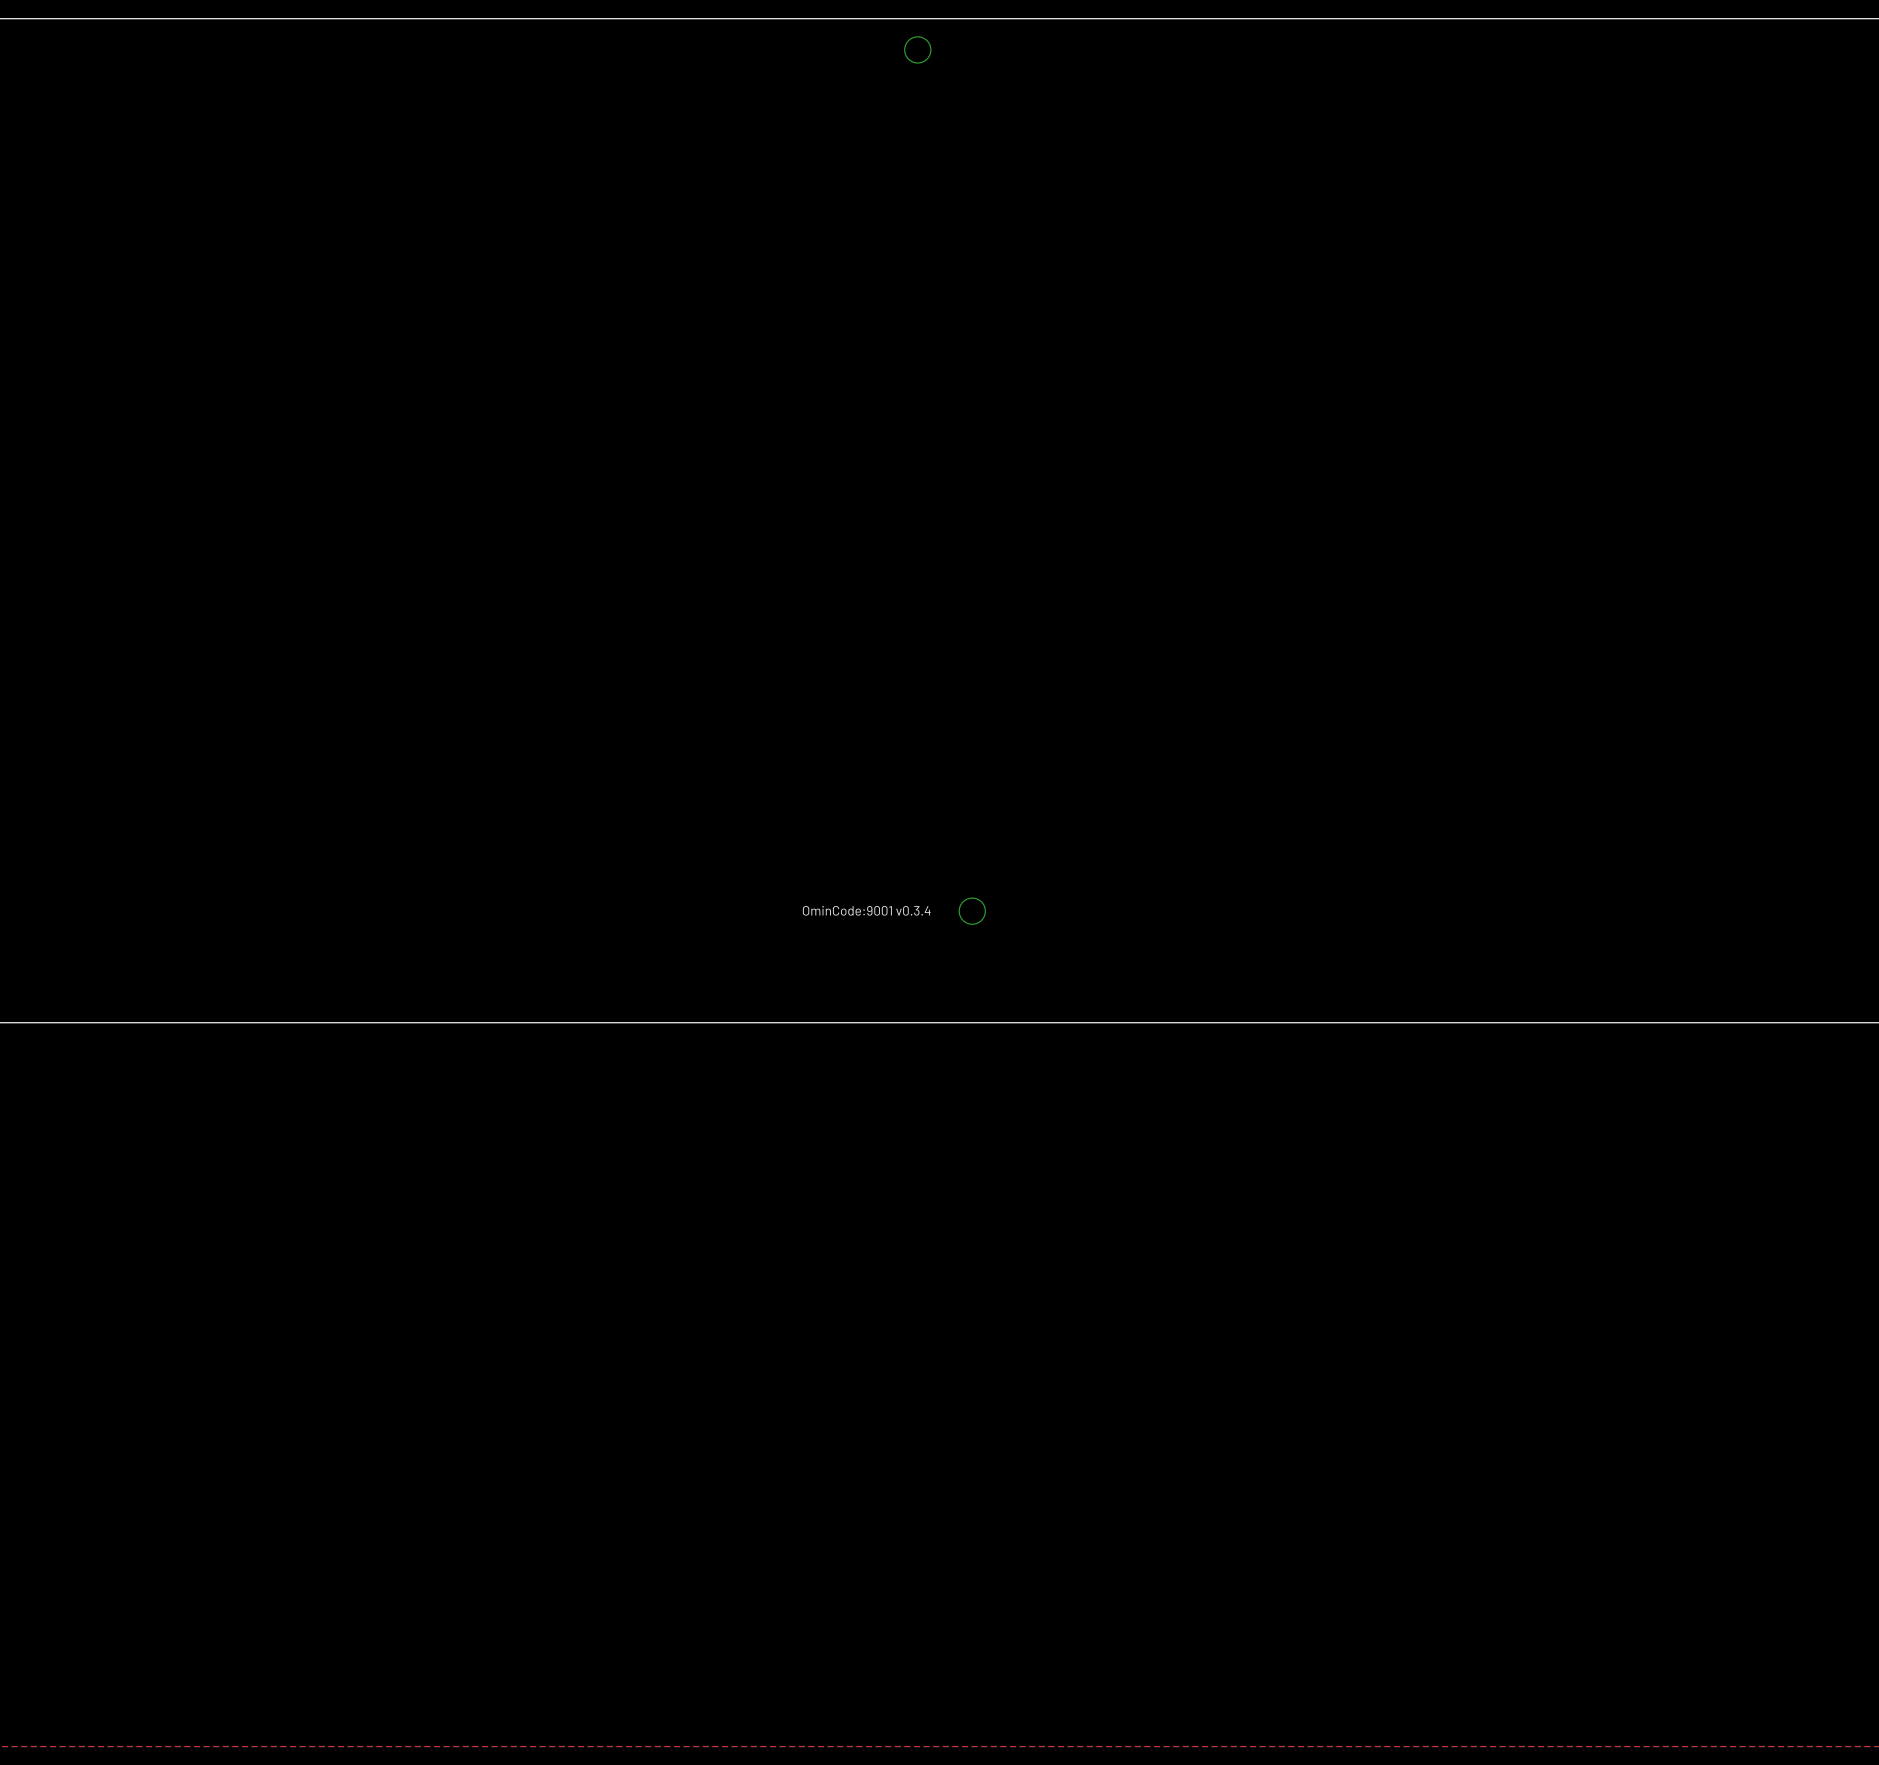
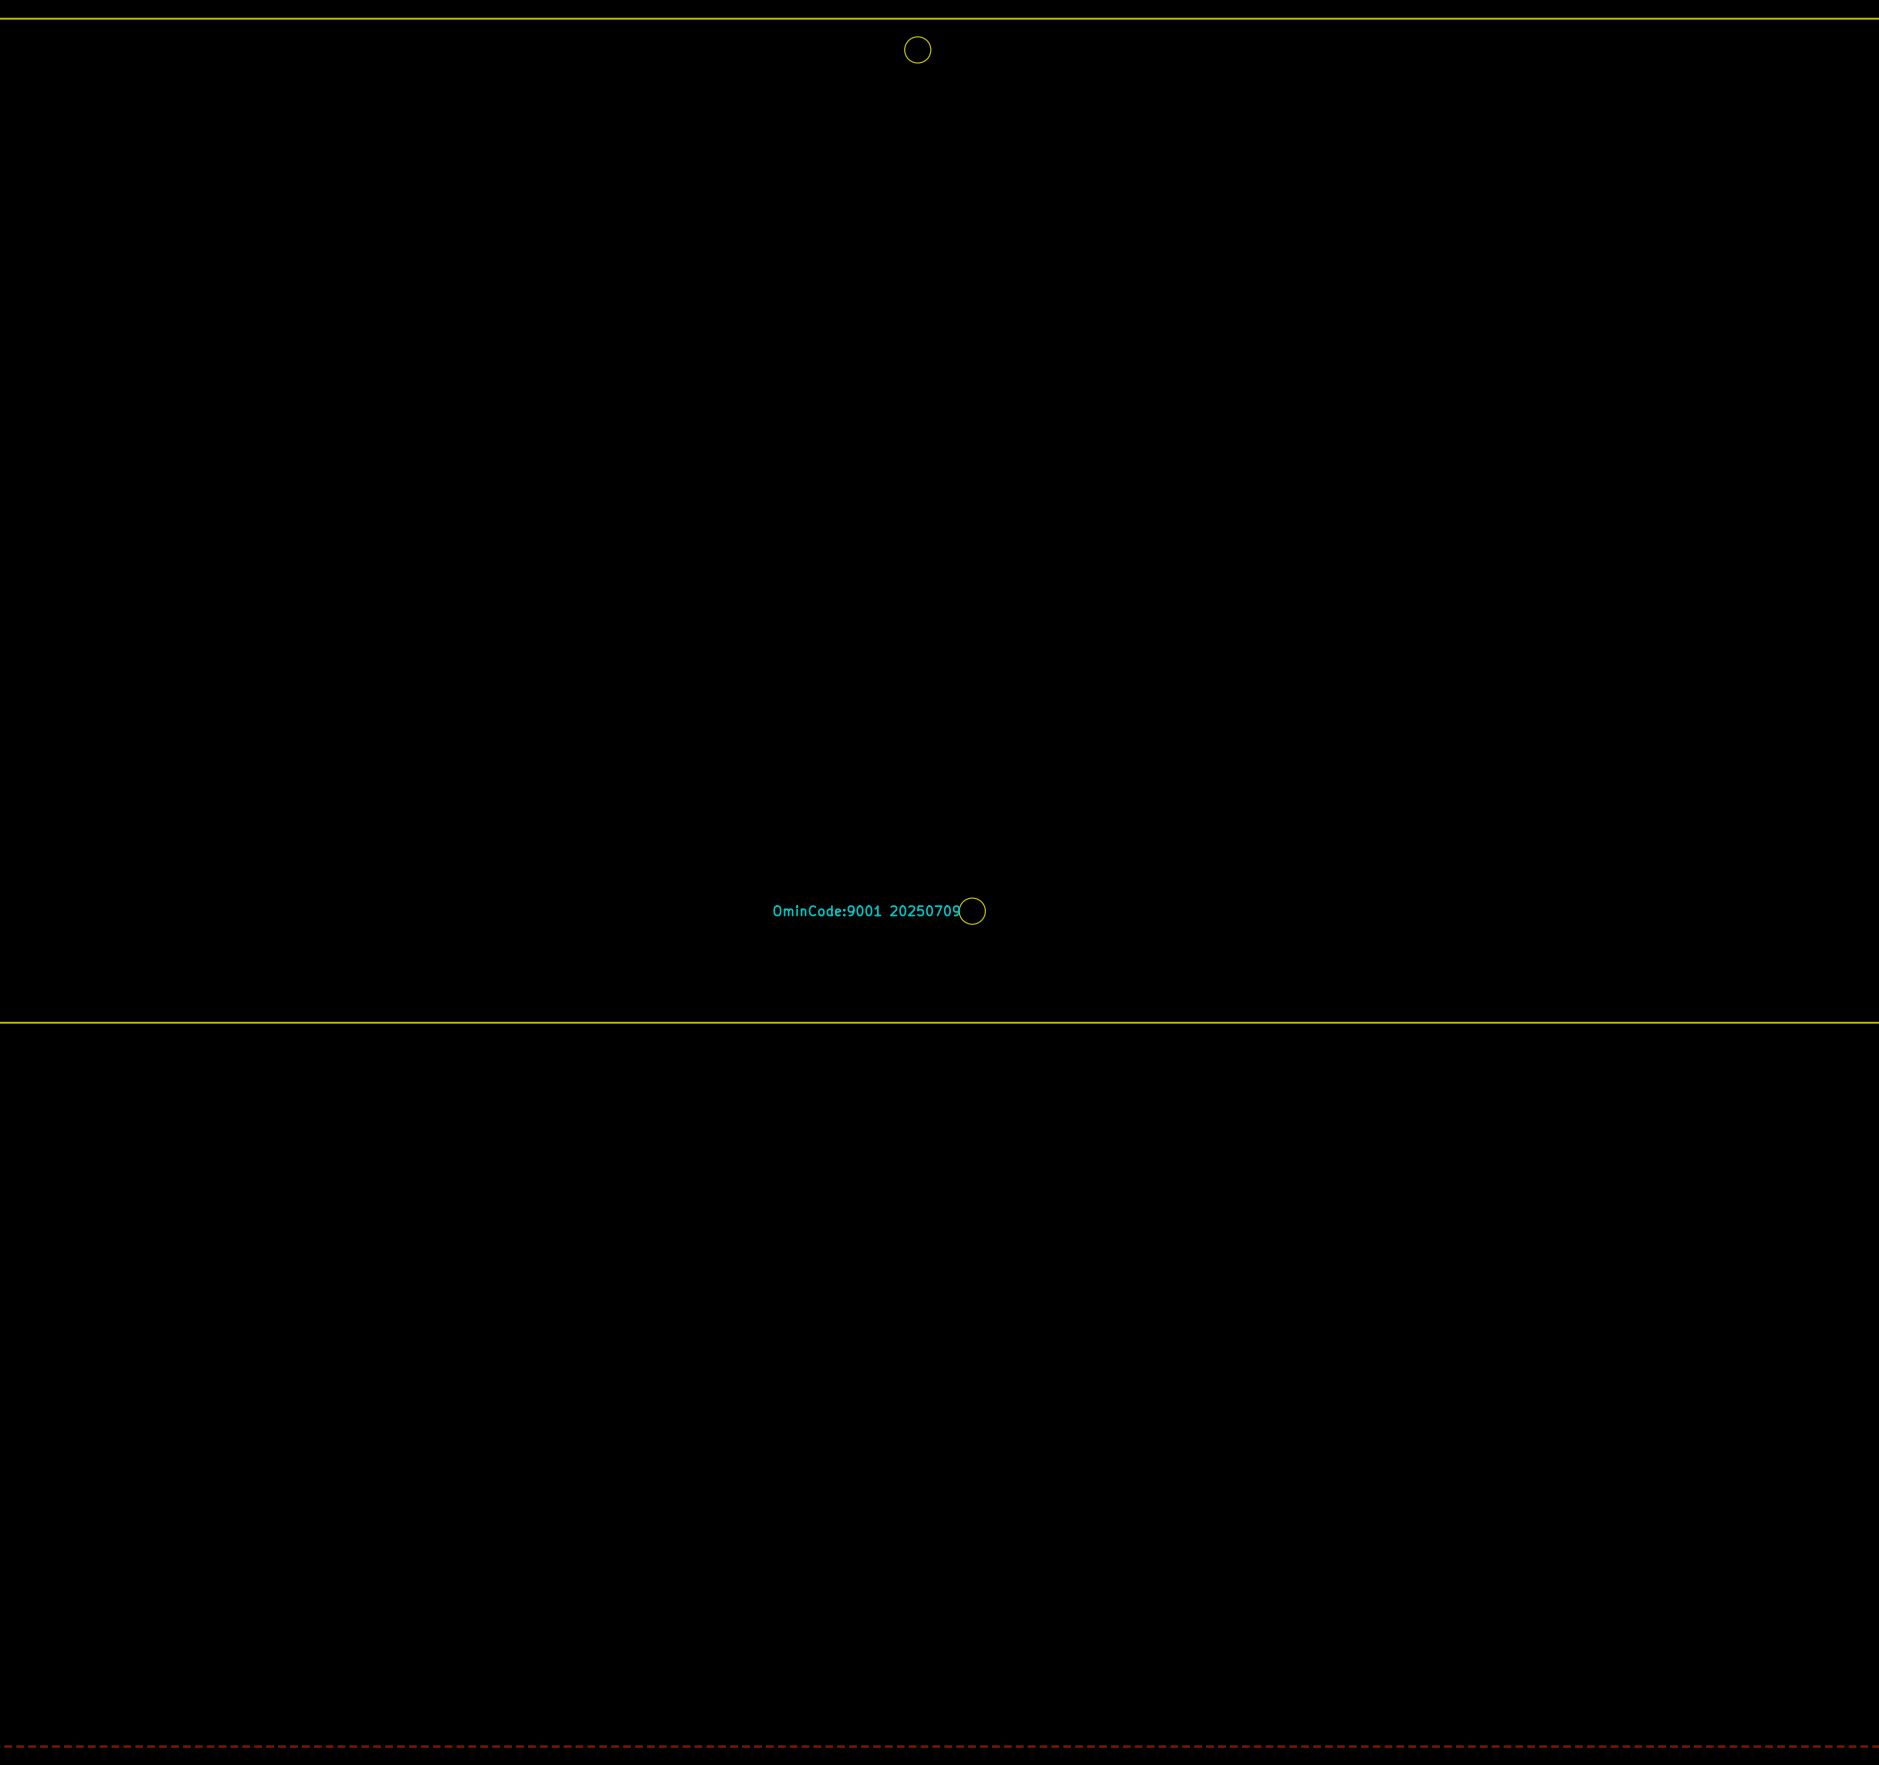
text: OminCode:9001 v0.3.4 (866, 910) -> OminCode:9001 20250709 (866, 910)

